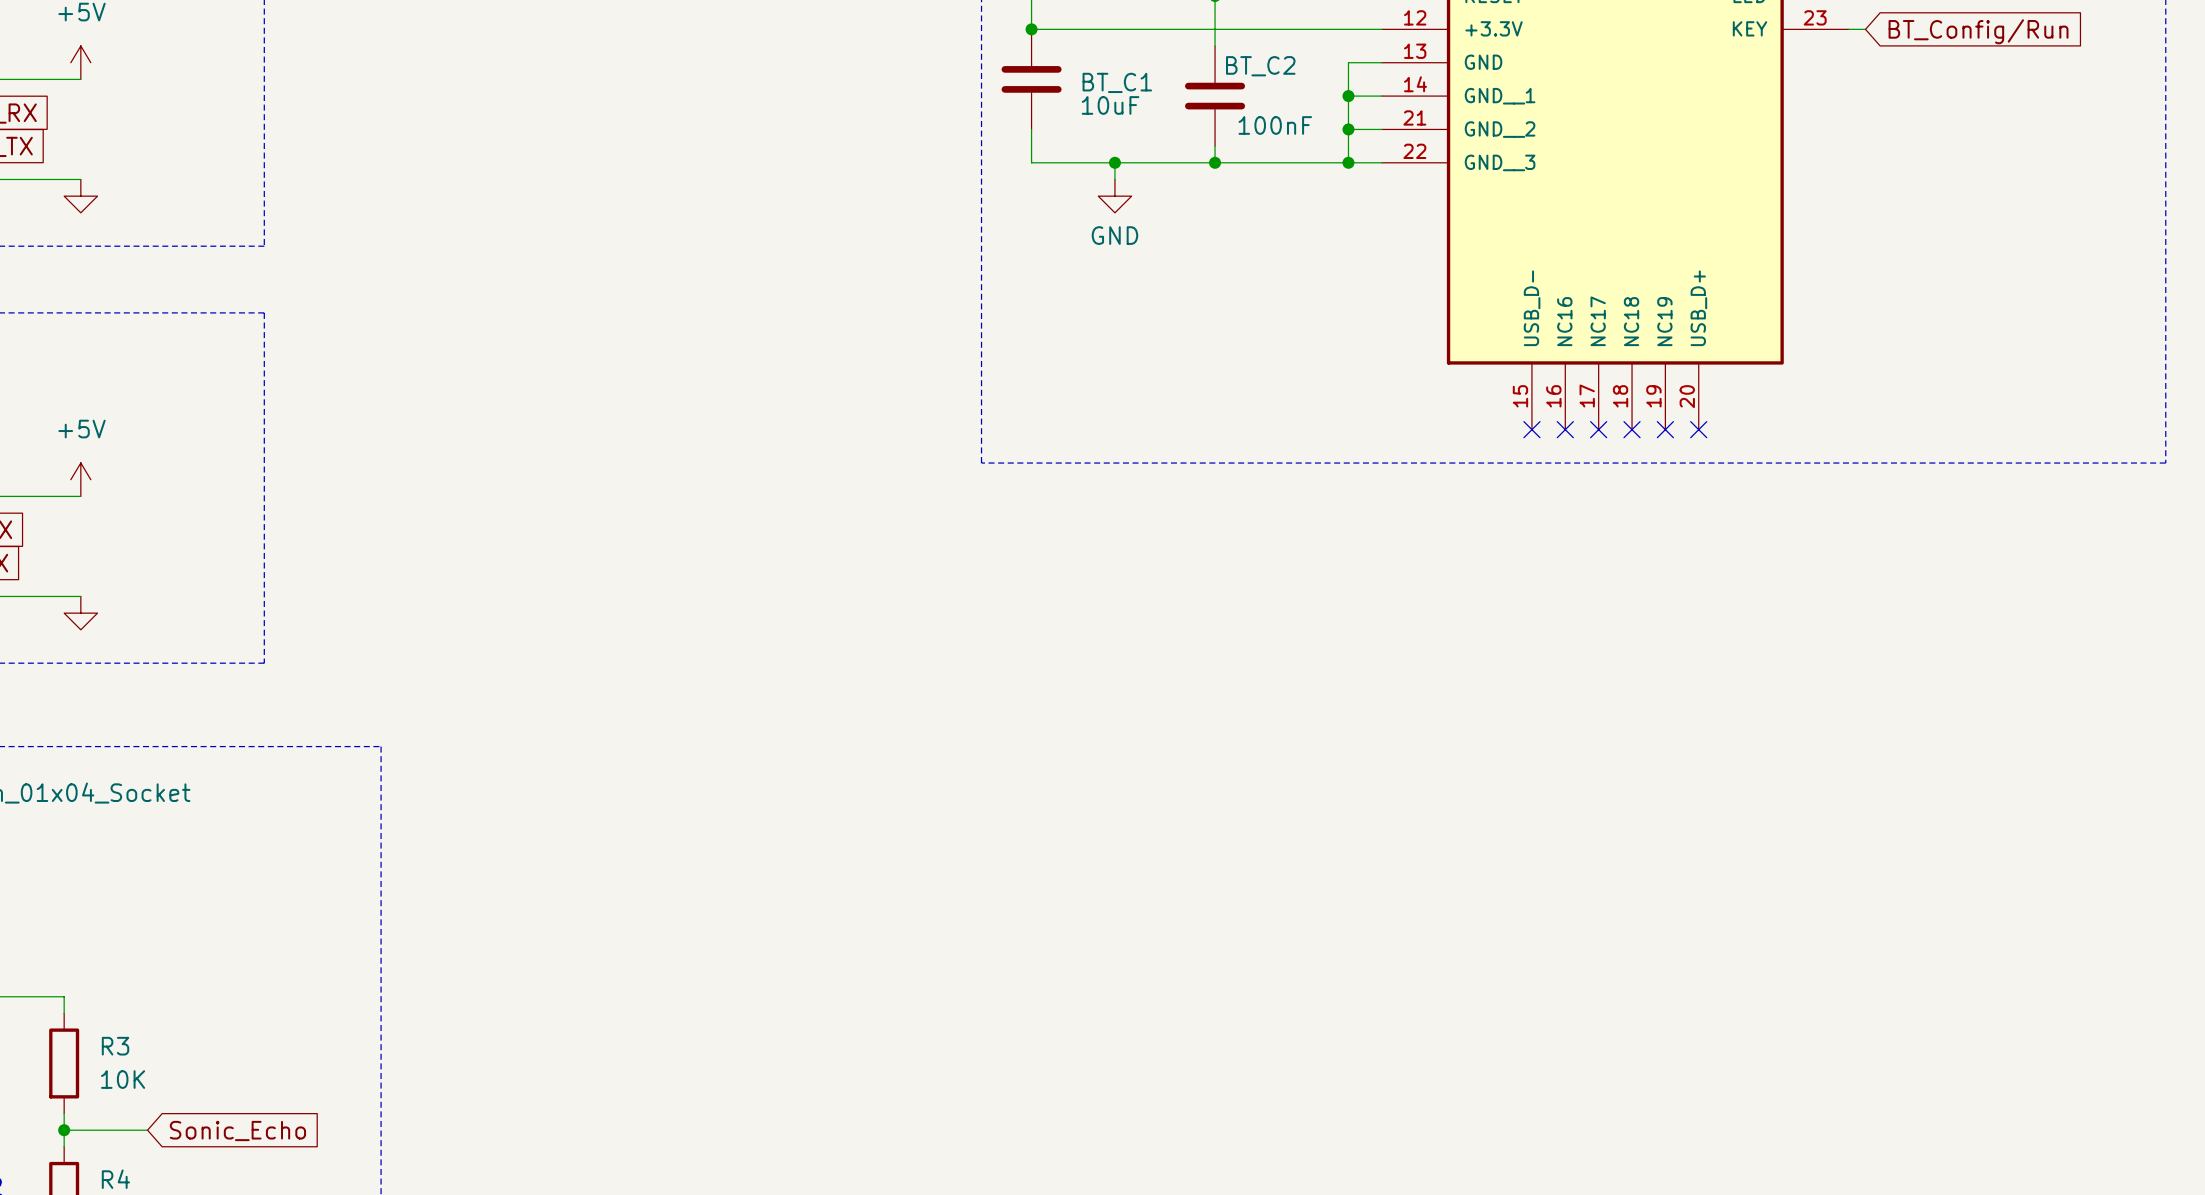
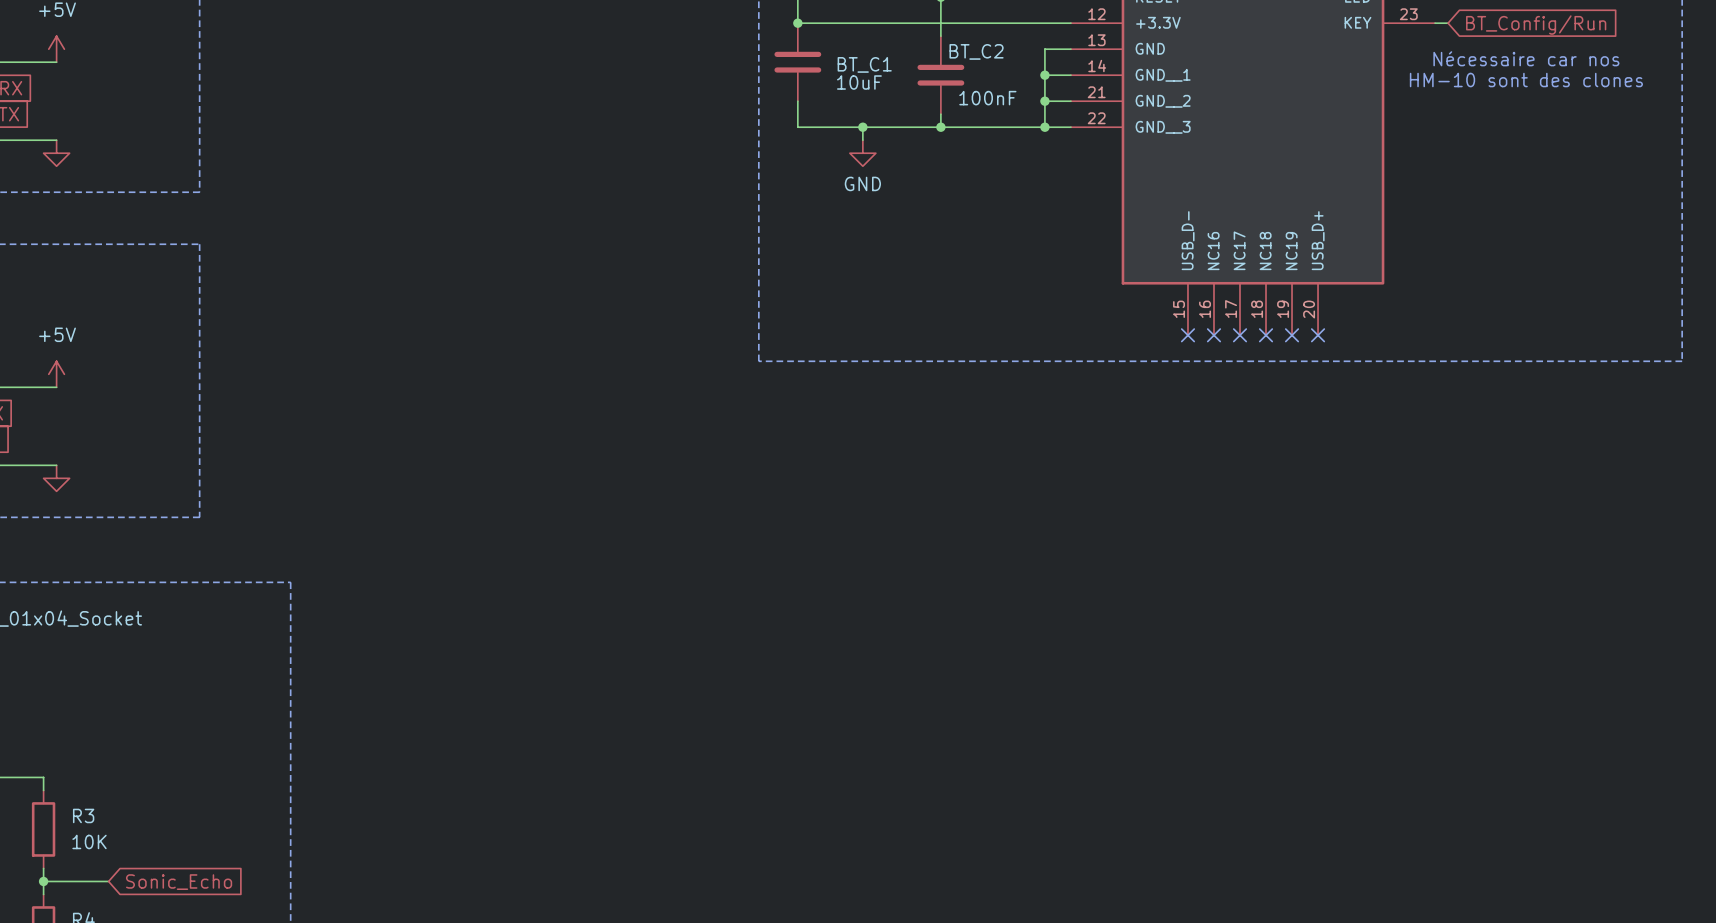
text: none -> Nécessaire car nos (1526, 58)
text: none -> HM-10 sont des clones (1526, 80)

